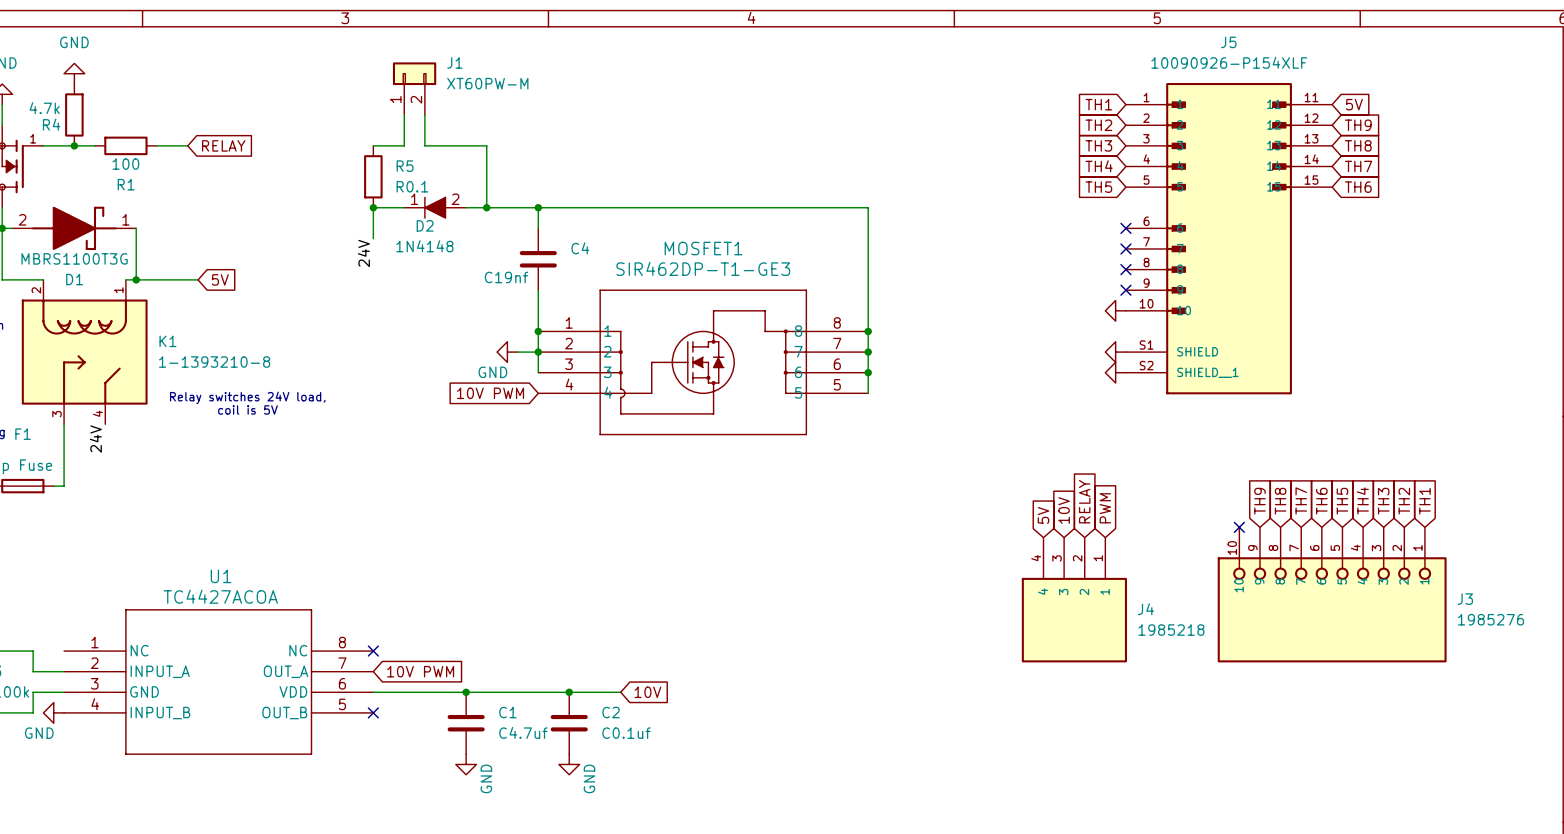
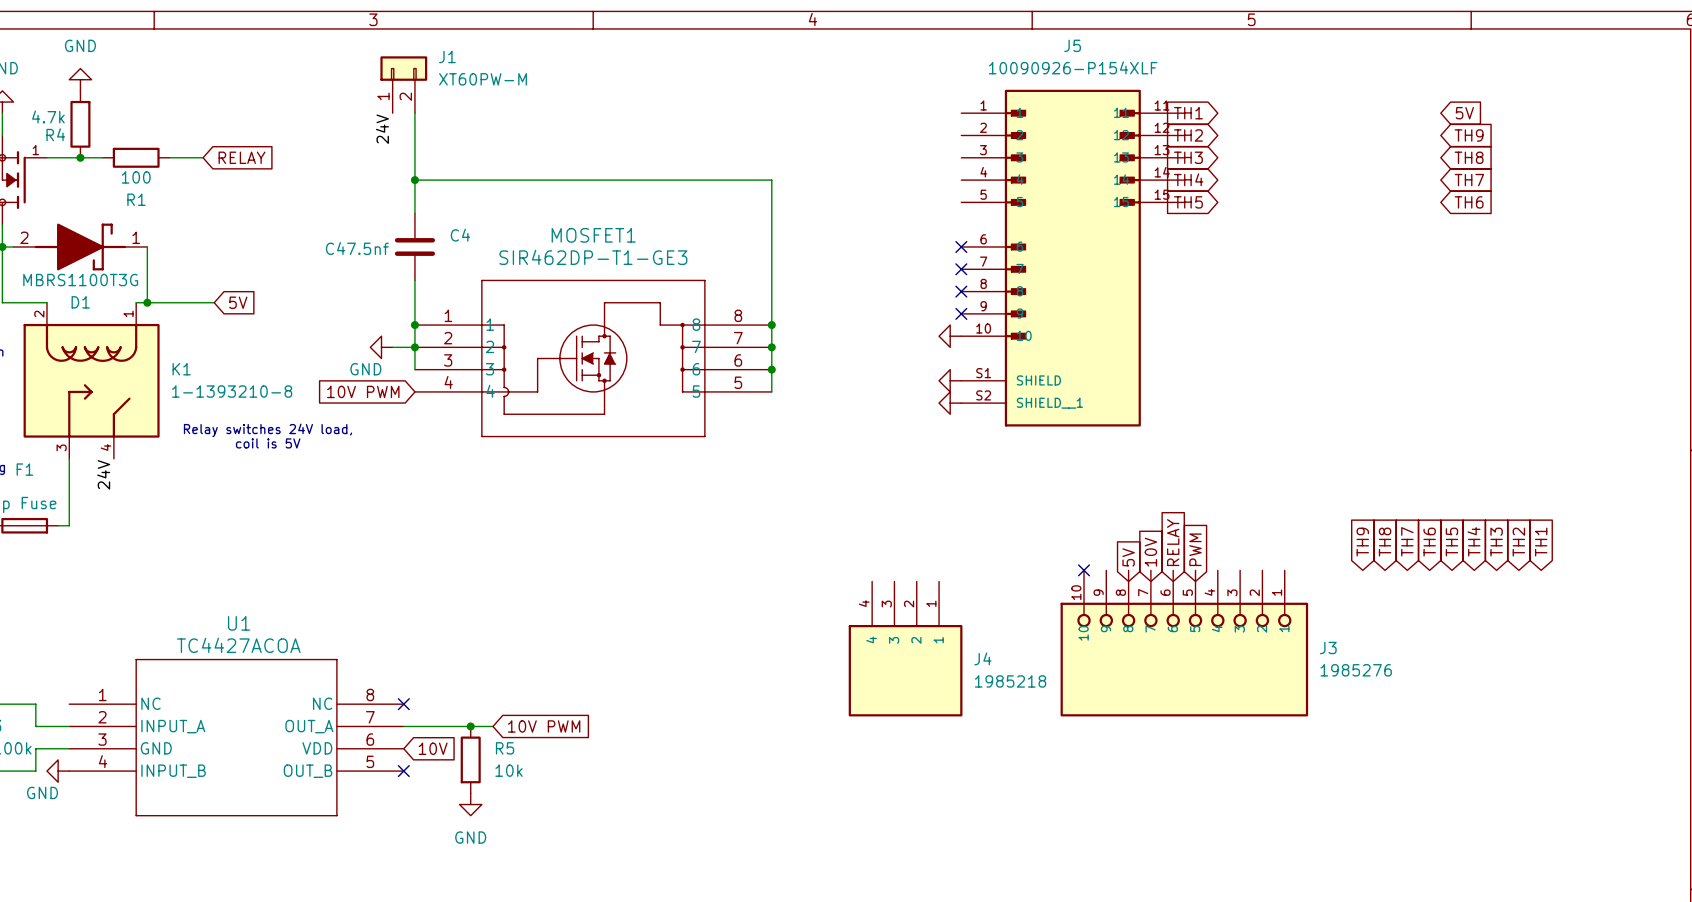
J1 position: (414, 88) -> (403, 84)
wire: none -> (414, 113) (414, 213)
wire: (404, 114) (404, 145) (373, 145) -> none
wire: (424, 114) (424, 145) (486, 145) (486, 207) -> none
wire: none -> (414, 180) (771, 180) (771, 391)
R5 position: (373, 176) -> (470, 759)
R5 value: R0.1 (412, 186) -> 10k (509, 770)
junction position: (373, 207) -> (414, 180)
wire: (404, 207) (373, 207) (373, 238) -> none
D2: 1N4148 (435, 207) -> none
wire: (466, 207) (868, 207) (868, 393) -> none
junction: (486, 207) -> none
wire: (538, 207) (538, 228) -> none
junction: (538, 207) -> none
no-connect mark: none -> (961, 246)
no-connect mark: (1125, 228) -> none
J5 position: (1229, 238) -> (1072, 258)
no-connect mark: none -> (961, 269)
no-connect mark: (1125, 248) -> none
label position: 24V (363, 253) -> 24V (382, 129)
C4 position: (538, 259) -> (414, 246)
no-connect mark: none -> (961, 291)
no-connect mark: (1125, 269) -> none
C4 value: C19nf (506, 277) -> C47.5nf (357, 248)
wire: (538, 290) (538, 372) -> (414, 280) (414, 369)
no-connect mark: none -> (961, 313)
no-connect mark: (1125, 290) -> none
junction: none -> (414, 325)
junction: none -> (771, 325)
power symbol: none -> (950, 336)
power symbol: (1115, 310) -> none
junction: none -> (414, 347)
junction: none -> (771, 347)
junction: (538, 331) -> none
junction: (868, 331) -> none
junction: none -> (771, 369)
power symbol position: GND (507, 352) -> GND (381, 347)
wire: (517, 352) (538, 352) -> (392, 347) (414, 347)
junction: (538, 352) -> none
junction: (868, 352) -> none
power symbol: none -> (950, 380)
power symbol: (1115, 352) -> none
global label: none -> 10V PWM (363, 391)
MOSFET1 position: (703, 362) -> (593, 358)
junction: (868, 372) -> none
power symbol: none -> (950, 403)
power symbol: (1115, 372) -> none
global label: 10V PWM (490, 393) -> none
no-connect mark: none -> (1084, 570)
no-connect mark: (1239, 527) -> none
J3 position: (1332, 594) -> (1184, 643)
J4 position: (1074, 600) -> (905, 648)
wire: none -> (403, 726) (493, 726)
global label position: 10V PWM (420, 671) -> 10V PWM (544, 726)
wire: (373, 692) (620, 692) -> none
global label: none -> 10V (433, 748)
junction position: (466, 692) -> (470, 726)
junction: (569, 692) -> none
global label: 10V (647, 692) -> none
C1: C4.7uf (466, 723) -> none
C2: C0.1uf (569, 723) -> none
power symbol position: GND (466, 764) -> GND (470, 804)
power symbol: GND (569, 764) -> none
power symbol text rotation: 0° (486, 778) -> 90° clockwise (470, 837)

